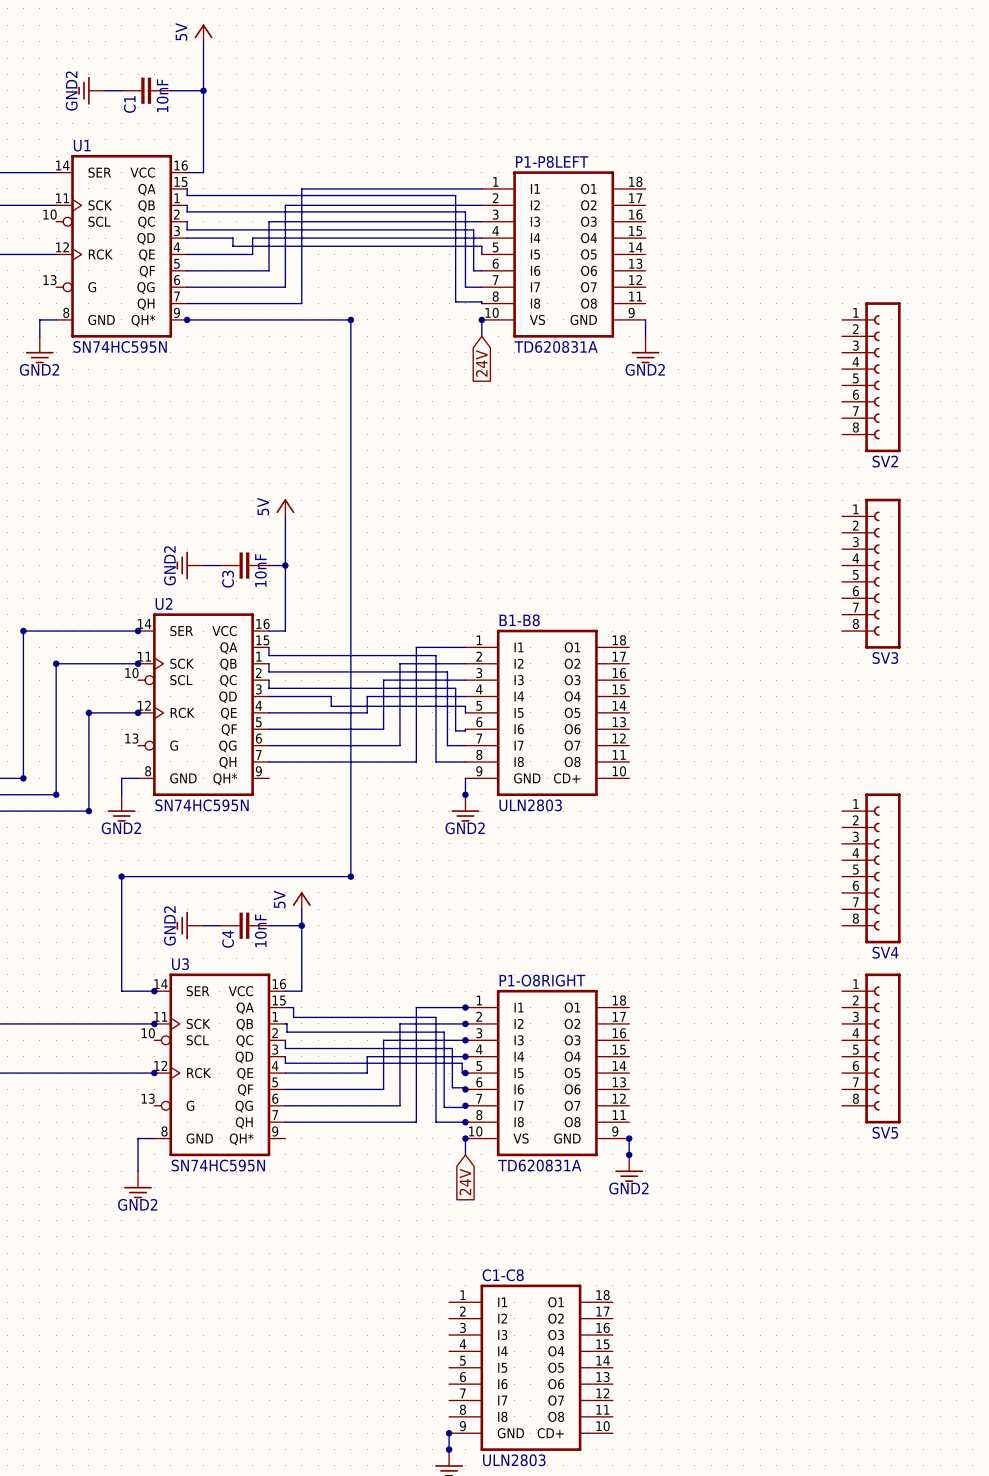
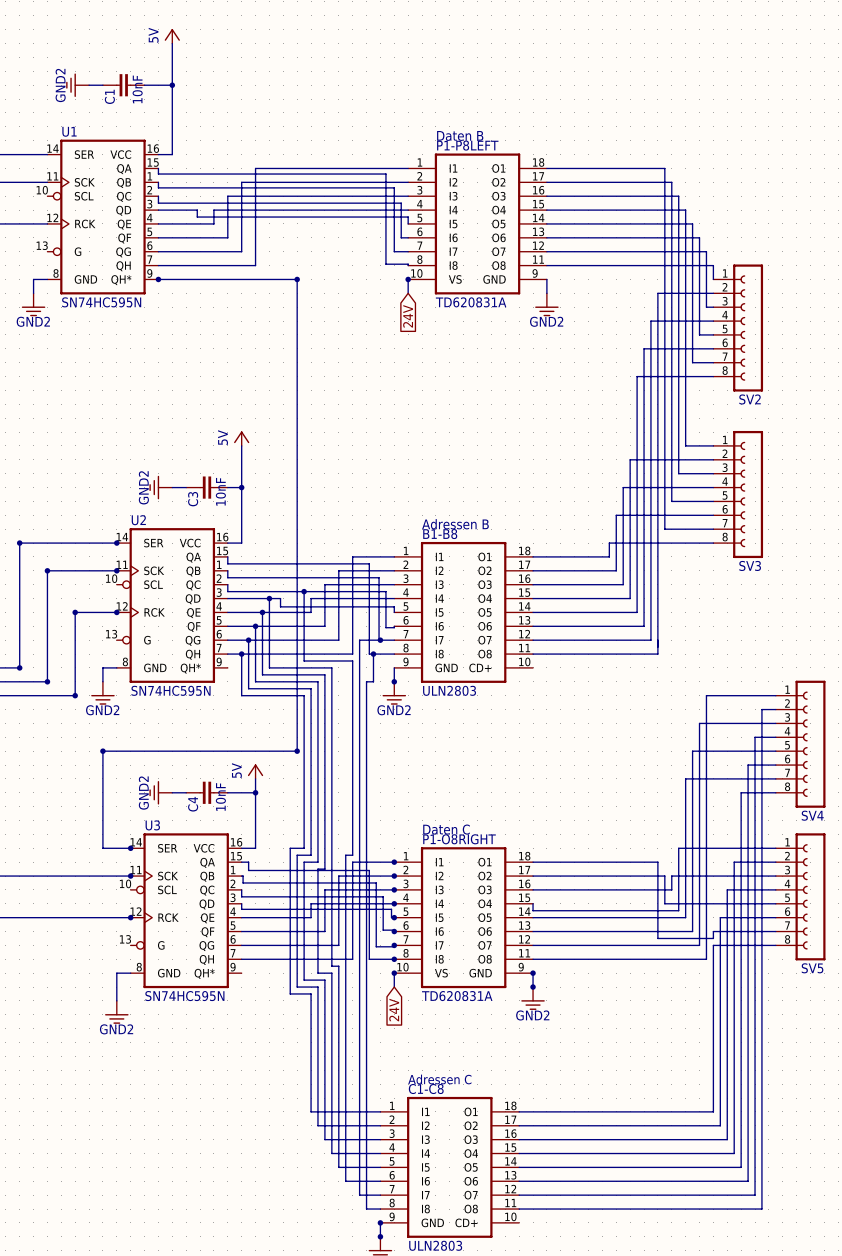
text: none -> Daten B (460, 135)
wire: none -> (546, 168) (664, 168) (664, 529) (713, 529)
wire: none -> (546, 182) (671, 182) (671, 501) (713, 501)
wire: none -> (546, 196) (678, 196) (678, 473) (713, 473)
wire: none -> (546, 210) (685, 210) (685, 445) (713, 445)
wire: none -> (546, 223) (692, 223) (692, 362) (713, 362)
wire: none -> (546, 237) (699, 237) (699, 334) (713, 334)
wire: none -> (546, 251) (706, 251) (706, 307) (713, 307)
wire: none -> (546, 265) (713, 265) (713, 279)
wire: none -> (713, 293) (657, 293) (657, 654) (533, 654)
wire: none -> (713, 321) (650, 321) (650, 640) (533, 640)
wire: none -> (713, 348) (644, 348) (644, 626) (533, 626)
wire: none -> (713, 376) (637, 376) (637, 612) (533, 612)
wire: none -> (713, 459) (630, 459) (630, 598) (533, 598)
wire: none -> (713, 487) (623, 487) (623, 584) (533, 584)
wire: none -> (713, 515) (616, 515) (616, 570) (533, 570)
text: none -> Adressen B (455, 524)
wire: none -> (713, 543) (609, 543) (609, 556) (533, 556)
wire: none -> (304, 591) (304, 660) (352, 660) (352, 855) (345, 855) (345, 1181) (380, 1181)
junction: none -> (304, 591)
wire: none -> (269, 598) (269, 667) (331, 667) (331, 966) (338, 966) (338, 1167) (380, 1167)
junction: none -> (269, 598)
wire: none -> (262, 612) (262, 674) (324, 674) (324, 869) (317, 869) (317, 973) (331, 973) (331, 1153) (380, 1153)
junction: none -> (262, 612)
wire: none -> (255, 626) (255, 681) (317, 681) (317, 862) (304, 862) (304, 980) (324, 980) (324, 1139) (380, 1139)
junction: none -> (255, 626)
wire: none -> (248, 640) (248, 688) (311, 688) (311, 855) (297, 855) (297, 987) (317, 987) (317, 1125) (380, 1125)
junction: none -> (248, 640)
wire: none -> (379, 640) (359, 640) (359, 1195) (380, 1195)
junction: none -> (380, 640)
wire: none -> (241, 654) (241, 695) (304, 695) (304, 848) (290, 848) (290, 993) (311, 993) (311, 1111) (380, 1111)
junction: none -> (241, 654)
wire: none -> (373, 654) (373, 681) (366, 681) (366, 1209) (380, 1209)
junction: none -> (373, 654)
wire: none -> (775, 695) (706, 695) (706, 959) (533, 959)
wire: none -> (775, 709) (761, 709) (761, 1209) (519, 1209)
wire: none -> (775, 723) (699, 723) (699, 945) (533, 945)
wire: none -> (775, 737) (755, 737) (755, 1195) (519, 1195)
SV4 position: (871, 868) -> (800, 744)
wire: none -> (775, 751) (692, 751) (692, 931) (533, 931)
wire: none -> (775, 765) (748, 765) (748, 1181) (519, 1181)
wire: none -> (775, 778) (685, 778) (685, 917) (533, 917)
wire: none -> (775, 792) (741, 792) (741, 1167) (519, 1167)
text: none -> Daten C (446, 829)
wire: none -> (775, 848) (678, 848) (678, 910) (533, 910) (533, 903)
wire: none -> (533, 862) (657, 862) (657, 938) (713, 938) (713, 931) (775, 931)
wire: none -> (775, 862) (734, 862) (734, 1153) (519, 1153)
wire: none -> (533, 876) (664, 876) (664, 903) (775, 903)
wire: none -> (775, 876) (671, 876) (671, 889) (533, 889)
wire: none -> (775, 889) (727, 889) (727, 1139) (519, 1139)
SV5 position: (871, 1048) -> (800, 896)
wire: none -> (775, 917) (720, 917) (720, 1125) (519, 1125)
wire: none -> (775, 945) (713, 945) (713, 1111) (519, 1111)
text: none -> Adressen C (439, 1079)

